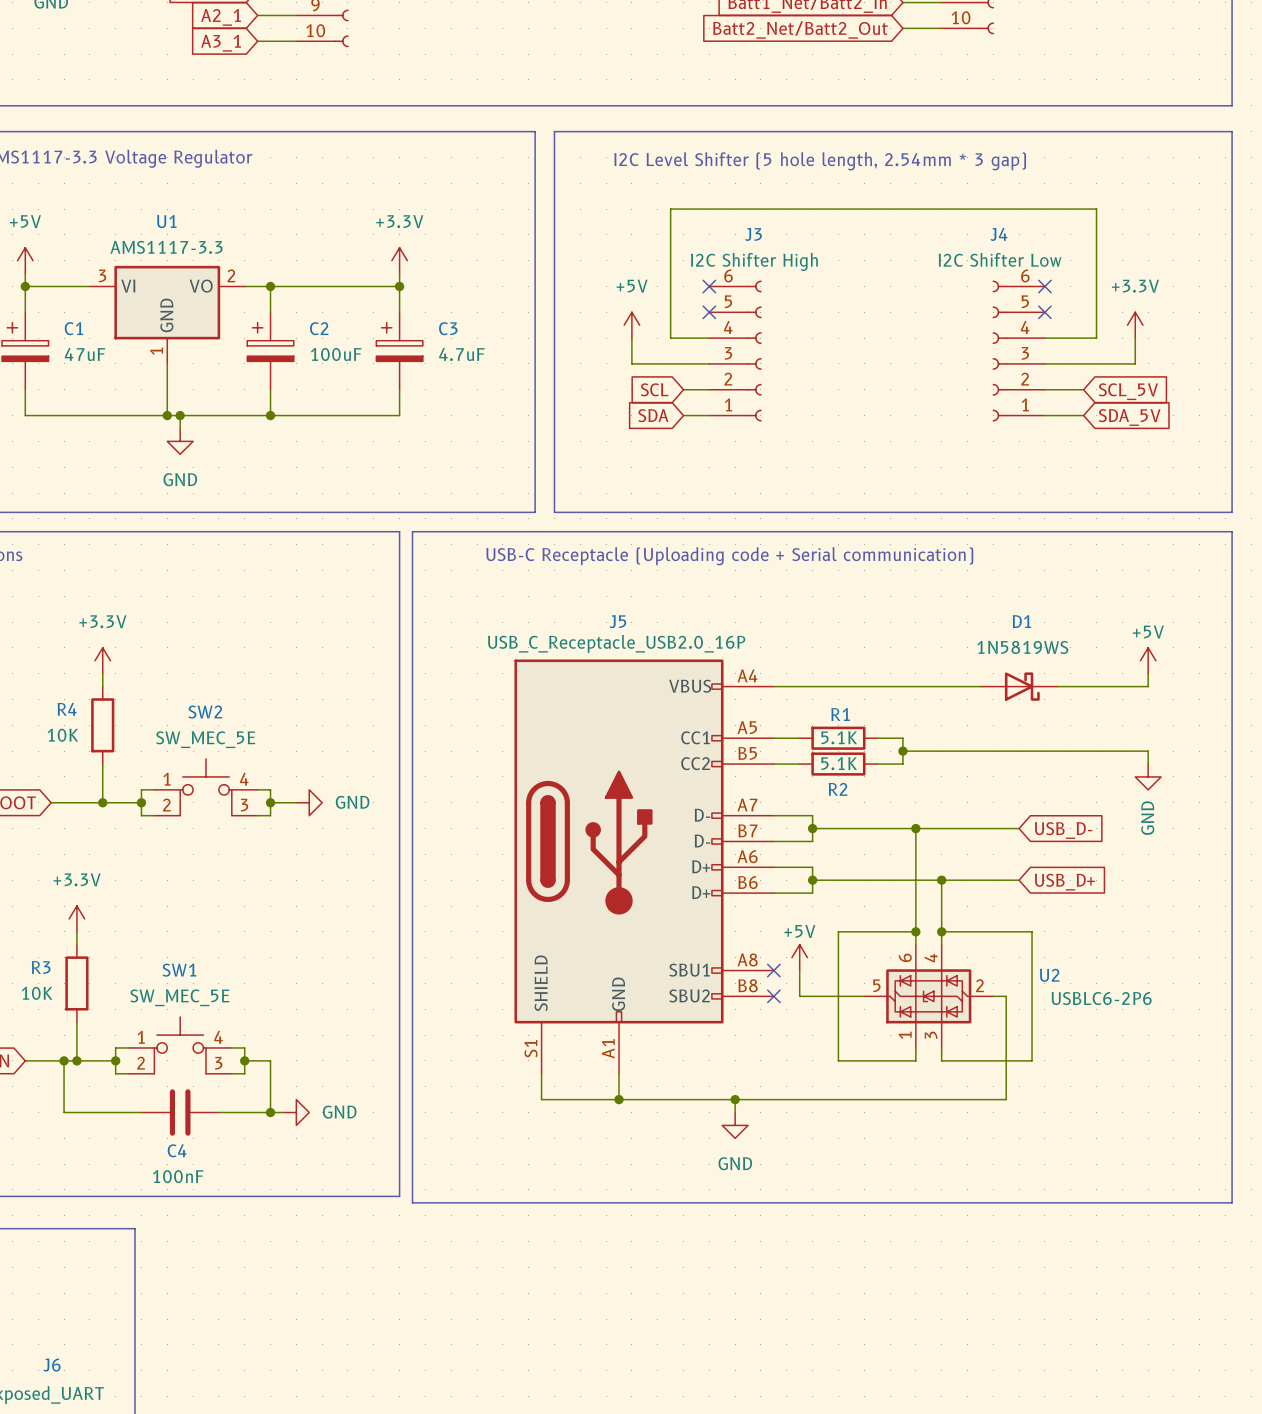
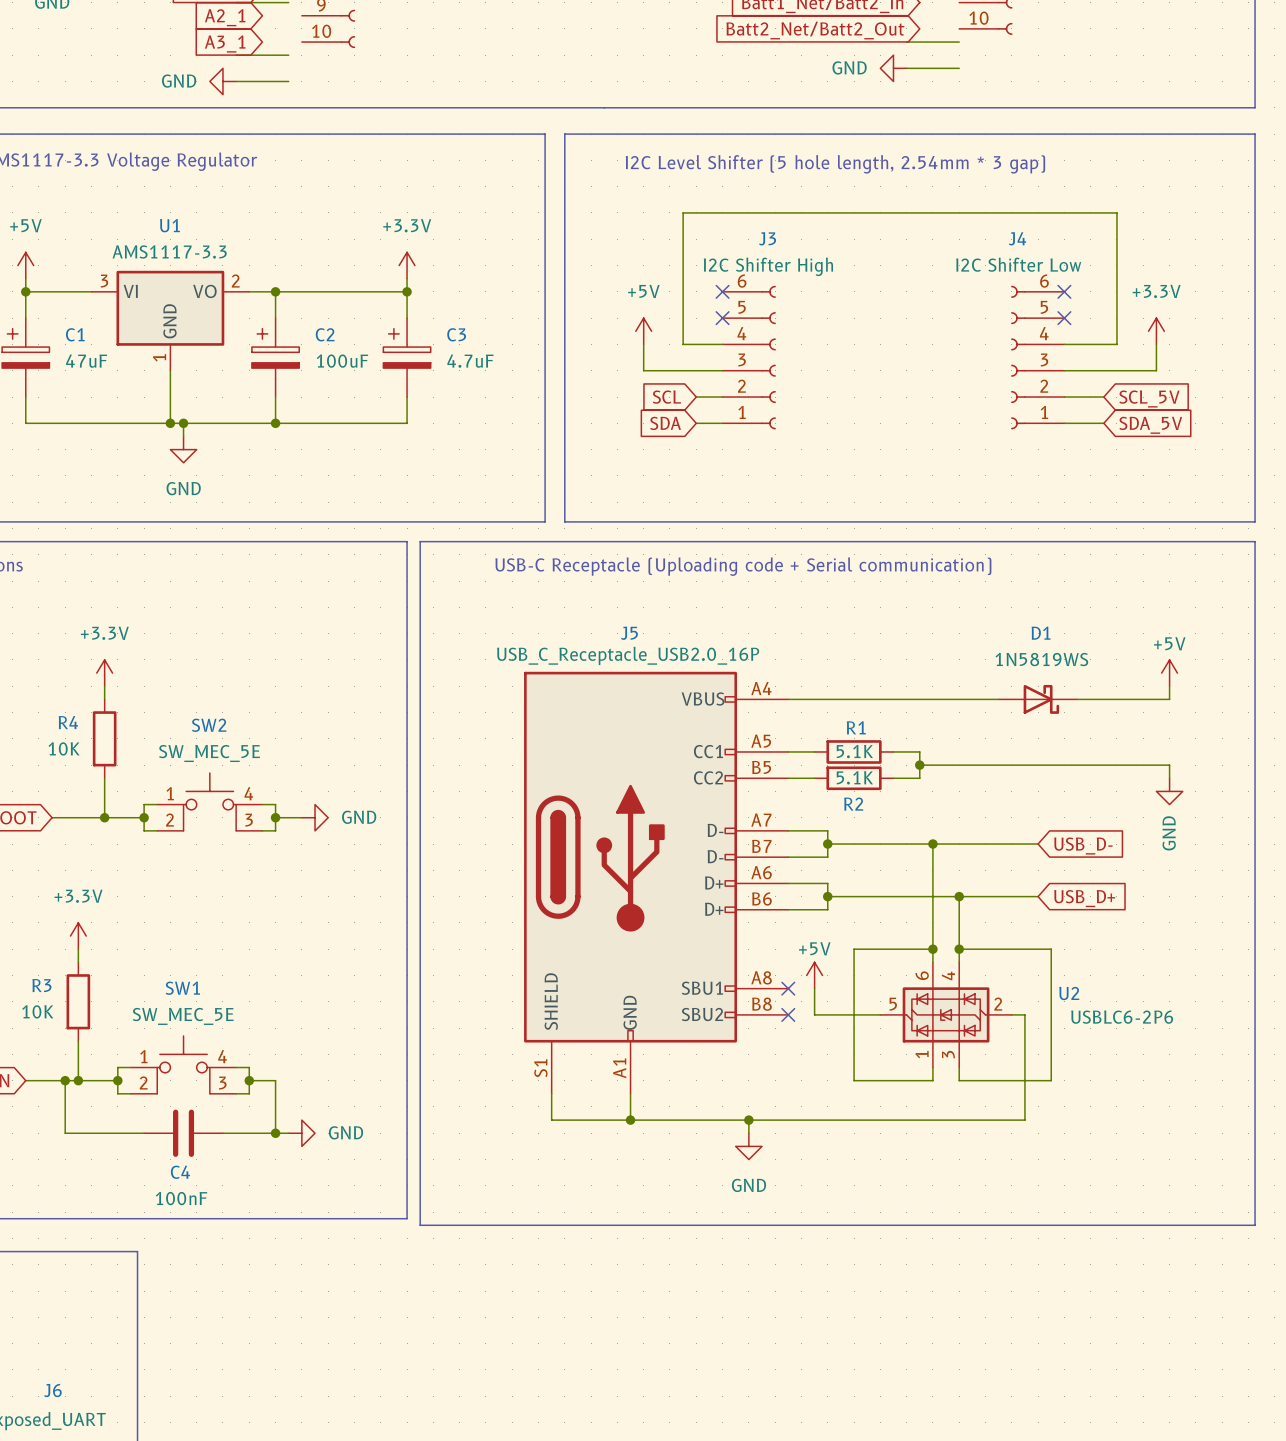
wire: none -> (236, 2) (288, 2)
wire: (902, 2) (941, 2) -> none
wire: (257, 15) (296, 15) -> none
wire: (902, 28) (941, 28) -> none
wire: (257, 41) (296, 41) -> none
wire: none -> (906, 42) (959, 42)
wire: none -> (236, 55) (288, 55)
power symbol: none -> GND (893, 68)
wire: none -> (906, 68) (959, 68)
power symbol: none -> GND (222, 81)
wire: none -> (236, 81) (288, 81)

